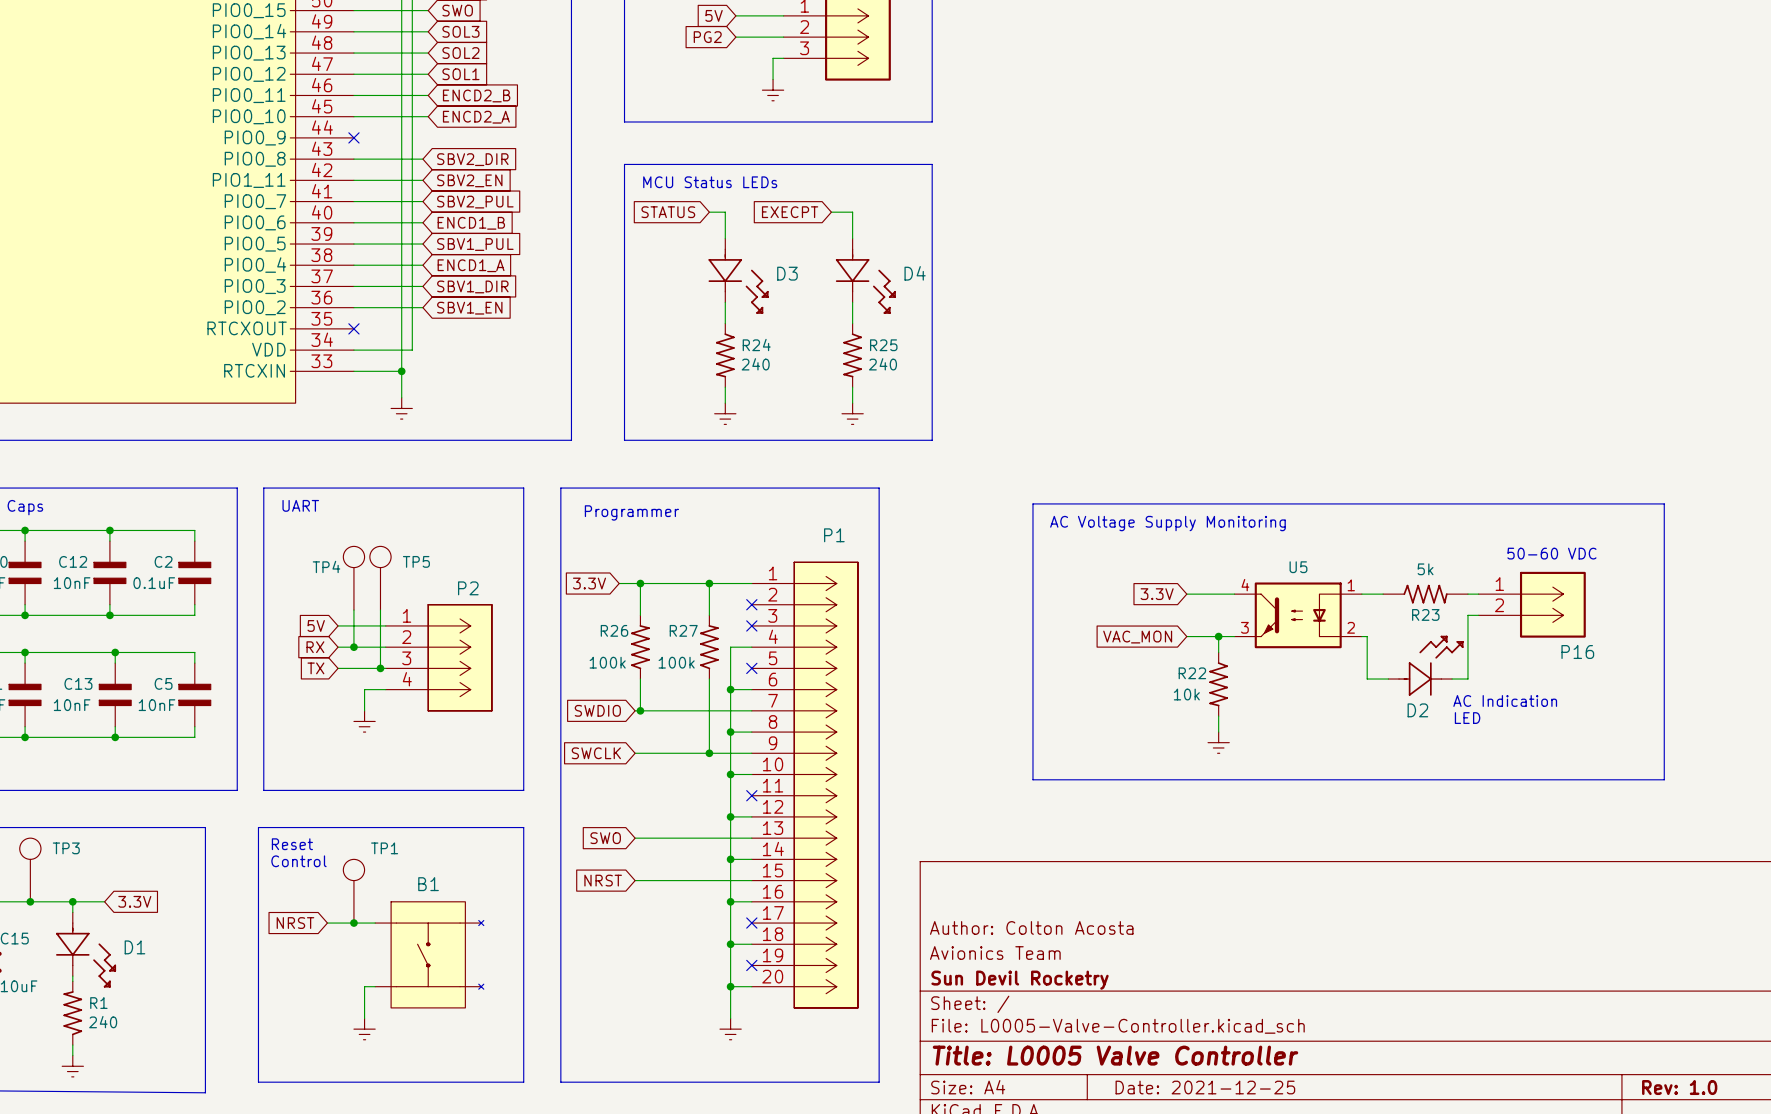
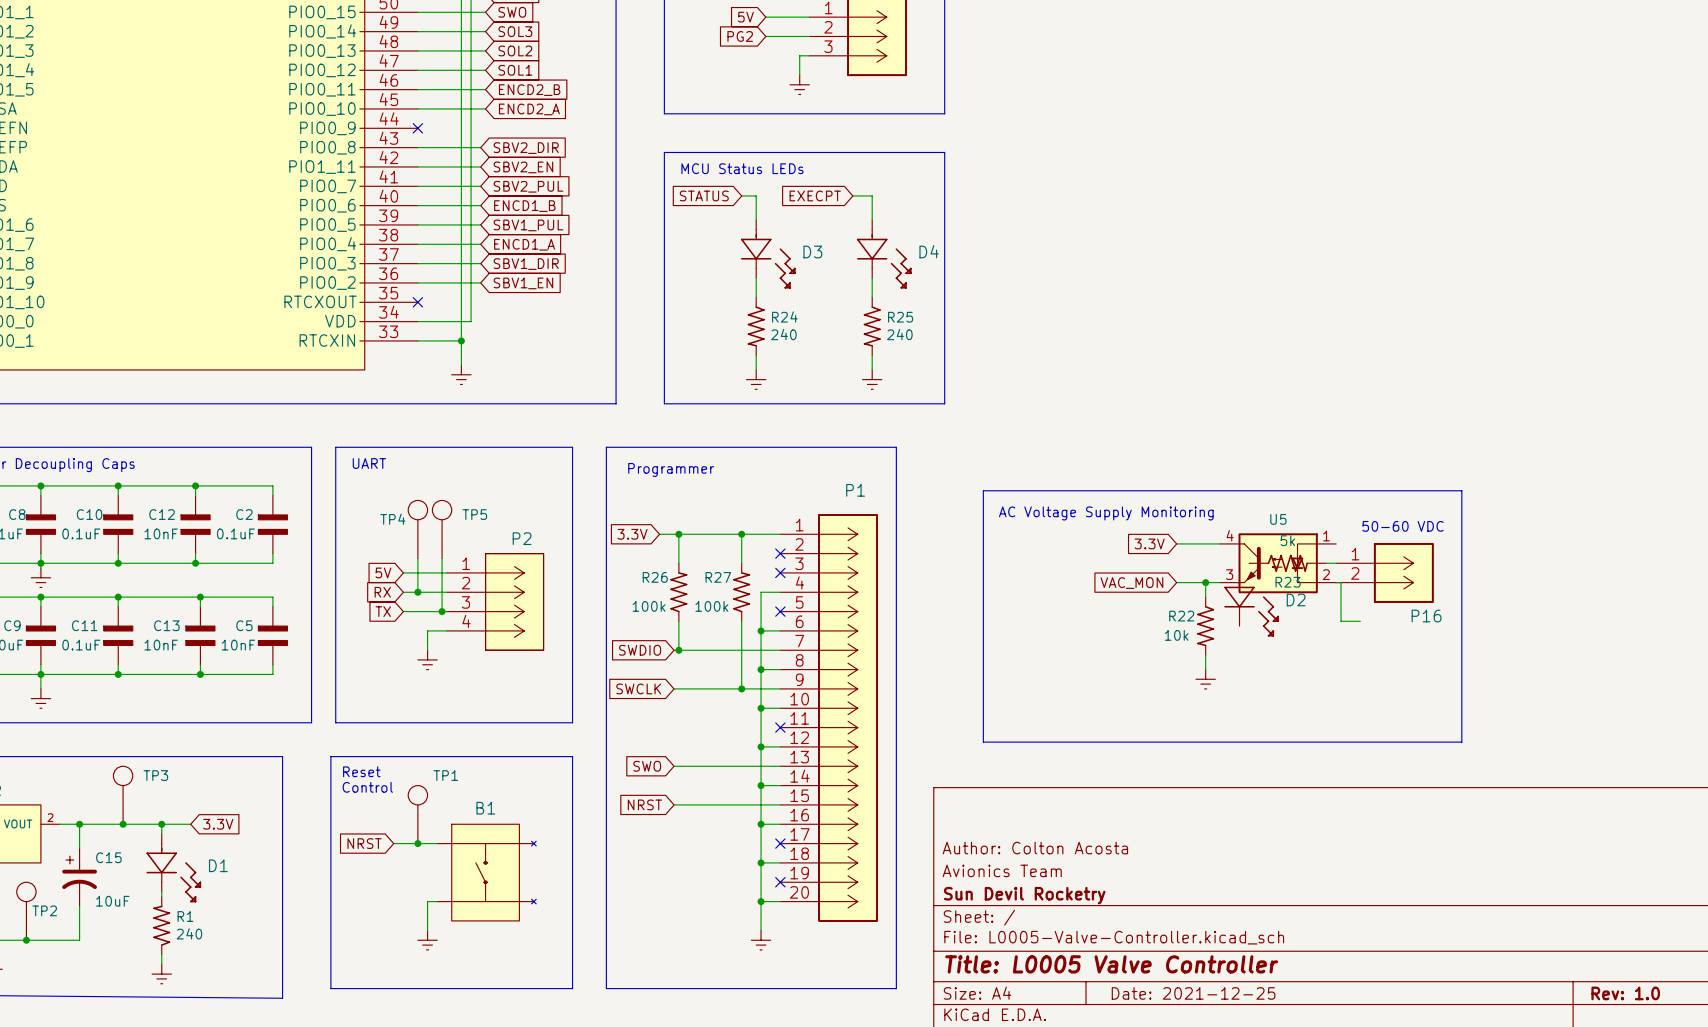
line: (1032, 503) (1032, 779) (1664, 779) (1664, 503) (1032, 503) -> (983, 490) (983, 742) (1461, 742) (1461, 490) (983, 490)
text position: AC Voltage Supply Monitoring (1167, 523) -> AC Voltage Supply Monitoring (1106, 513)
text position: 50-60 VDC (1551, 553) -> 50-60 VDC (1402, 526)
wire: (1361, 594) (1383, 594) -> none
R23 position: (1425, 594) -> (1287, 563)
wire: (1467, 594) (1478, 594) -> (1326, 563) (1336, 563)
P16 position: (1532, 604) -> (1384, 572)
wire: (1478, 615) (1467, 615) (1467, 679) (1452, 679) -> none
D2 position: (1425, 665) -> (1251, 602)
D2 rotation: 0° (1430, 665) -> 90° clockwise (1251, 606)
text: AC Indication (1505, 700) -> none
D2 name position: D2 (1417, 710) -> D2 (1296, 599)
text: LED (1467, 718) -> none

